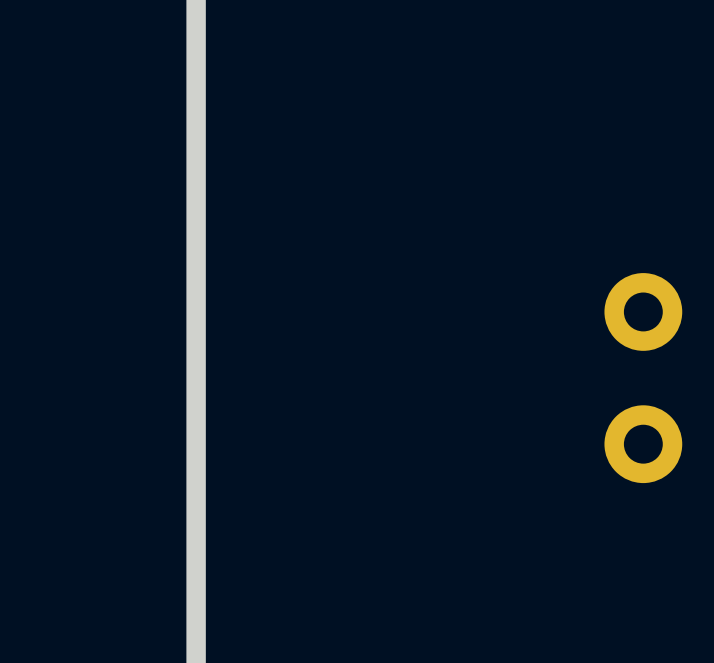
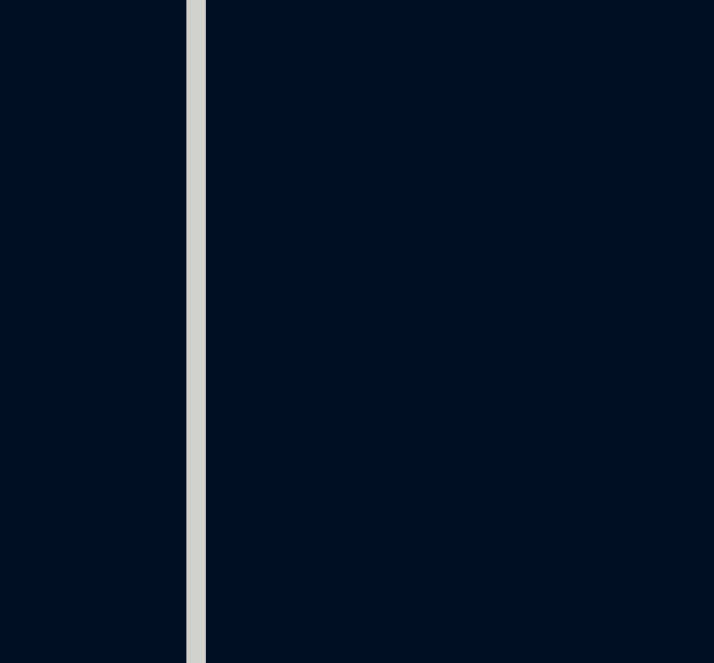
part: (643, 378) -> none

